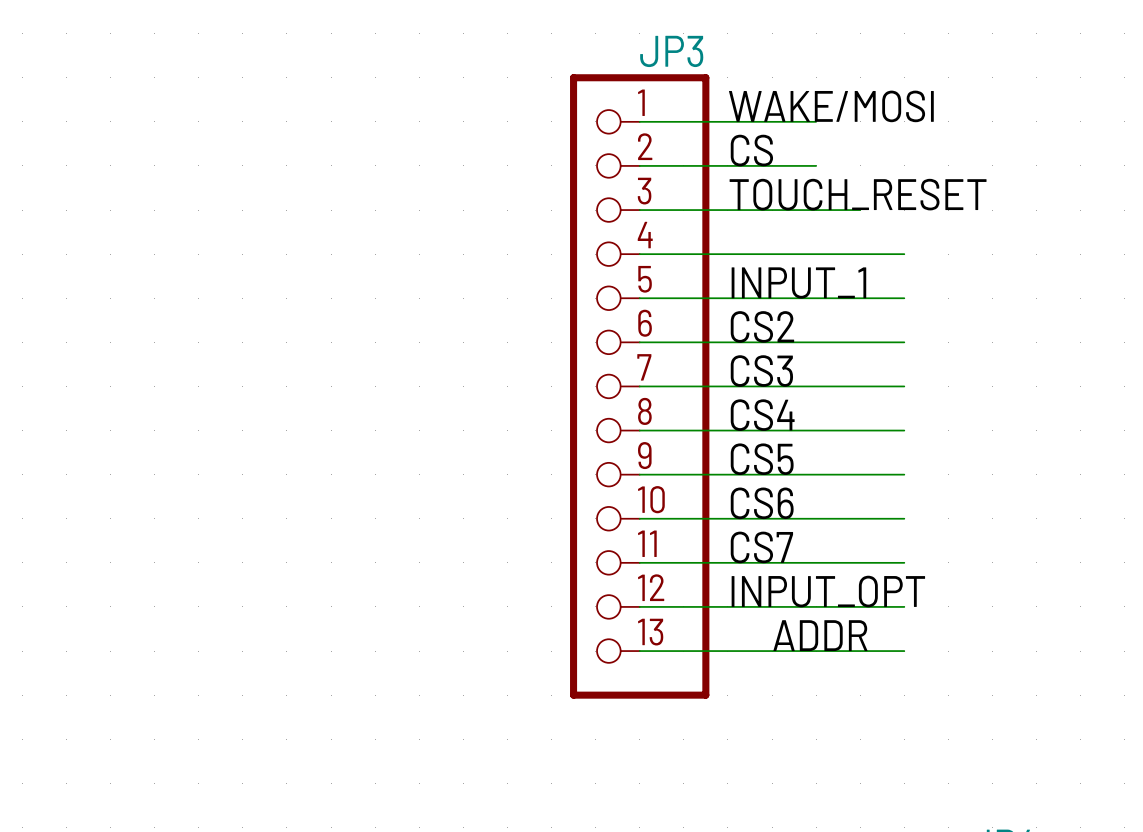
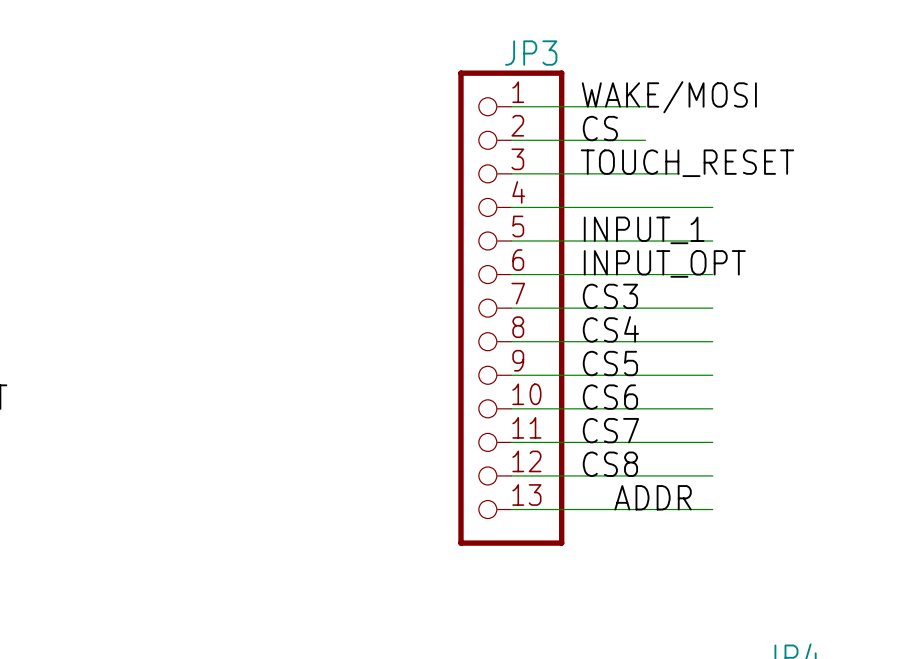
label: CS2 (762, 326) -> INPUT_OPT (664, 263)
label: INPUT_OPT (828, 591) -> CS8 (610, 464)

